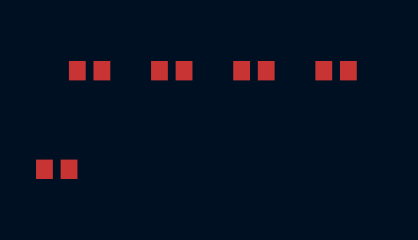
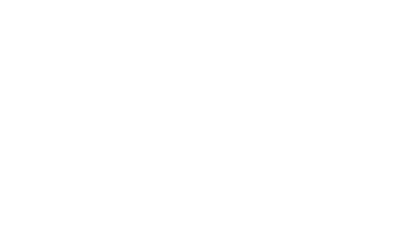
part: (89, 70) -> none
part: (171, 70) -> none
part: (253, 70) -> none
part: (336, 70) -> none
part: (56, 169) -> none

